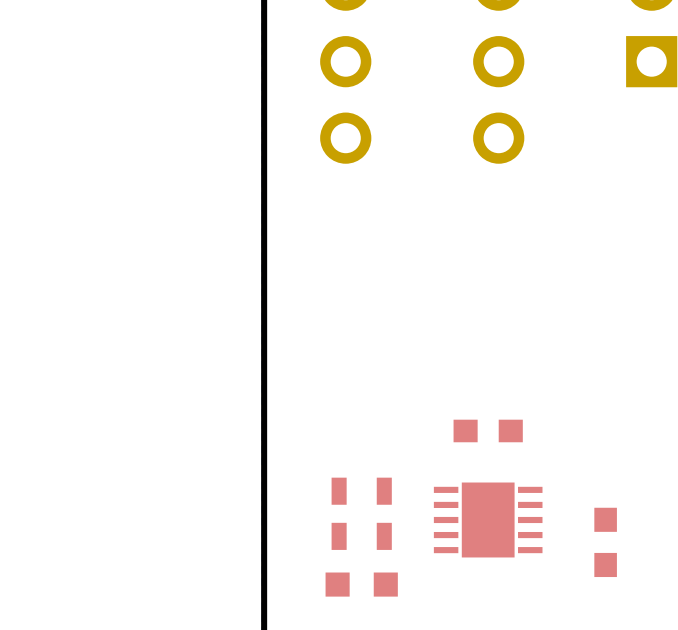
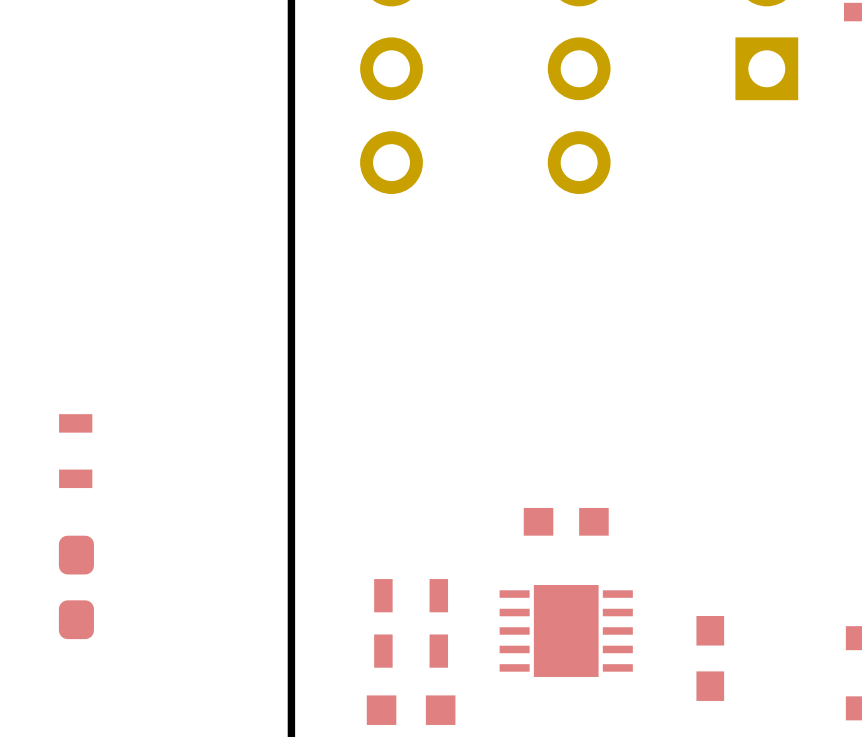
part: none -> (75, 451)
part: none -> (76, 587)

